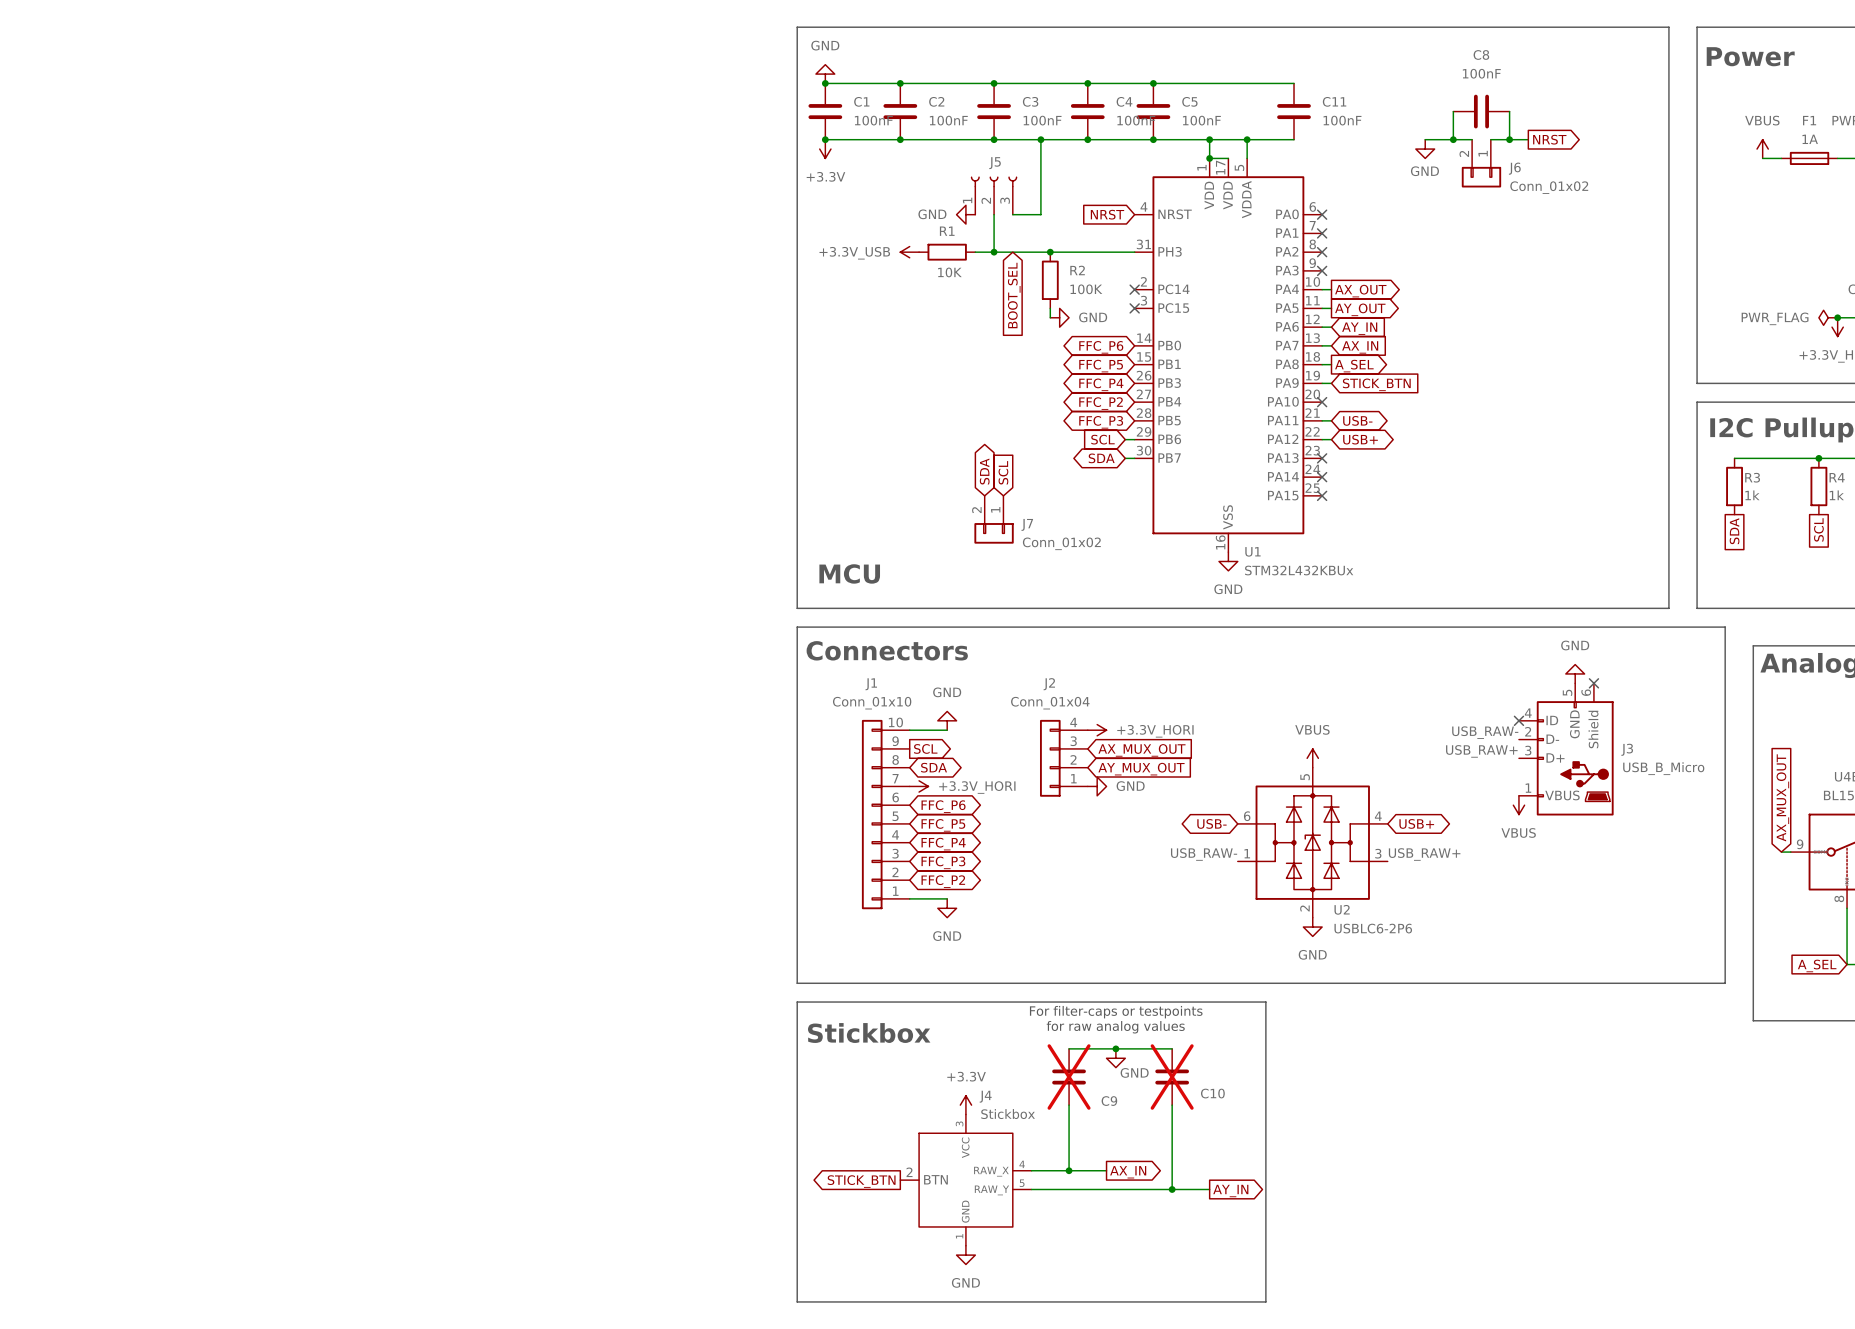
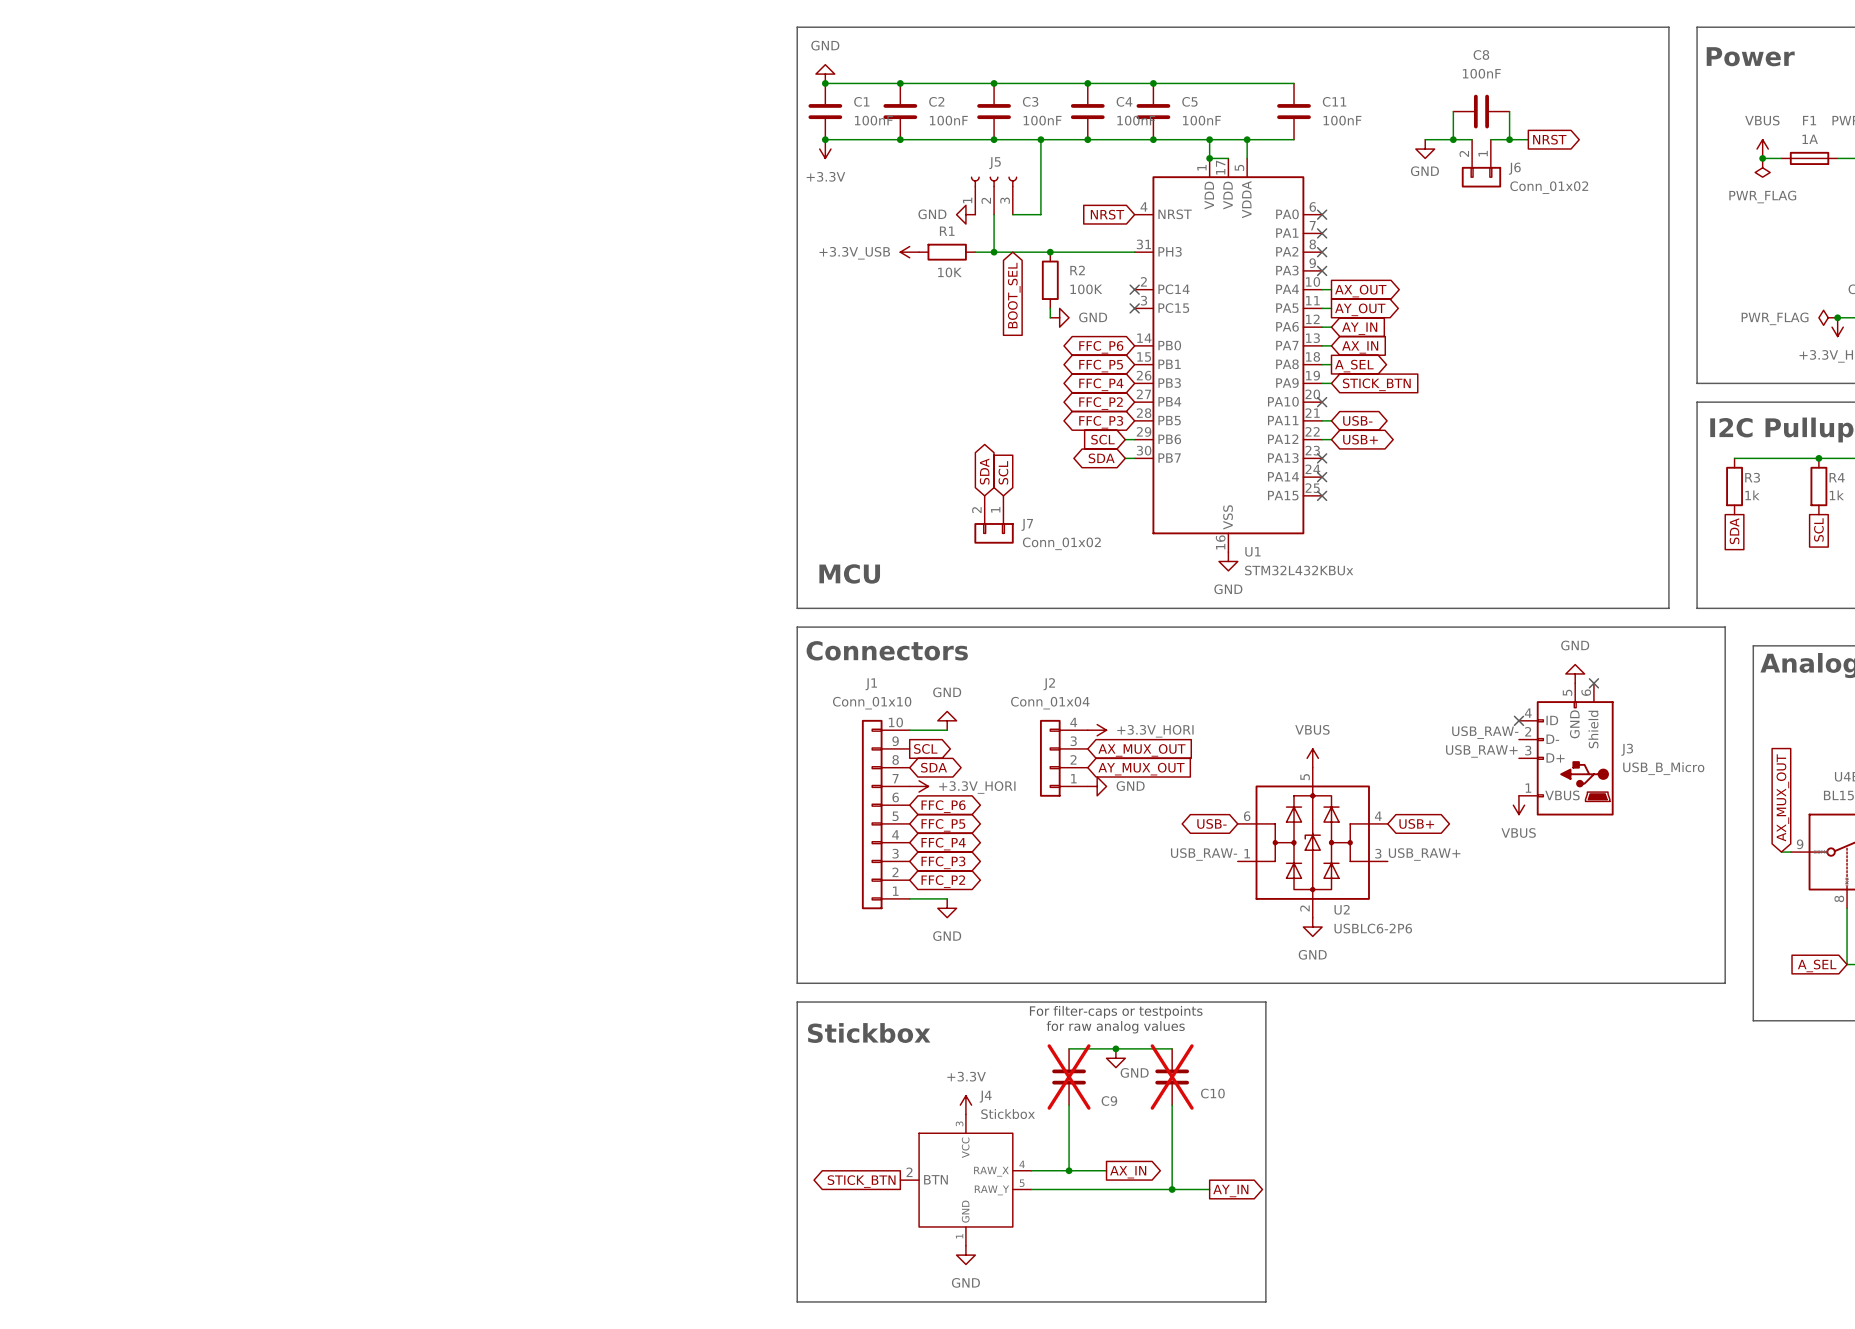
junction: none -> (1762, 158)
power symbol: none -> PWR_FLAG (1762, 167)

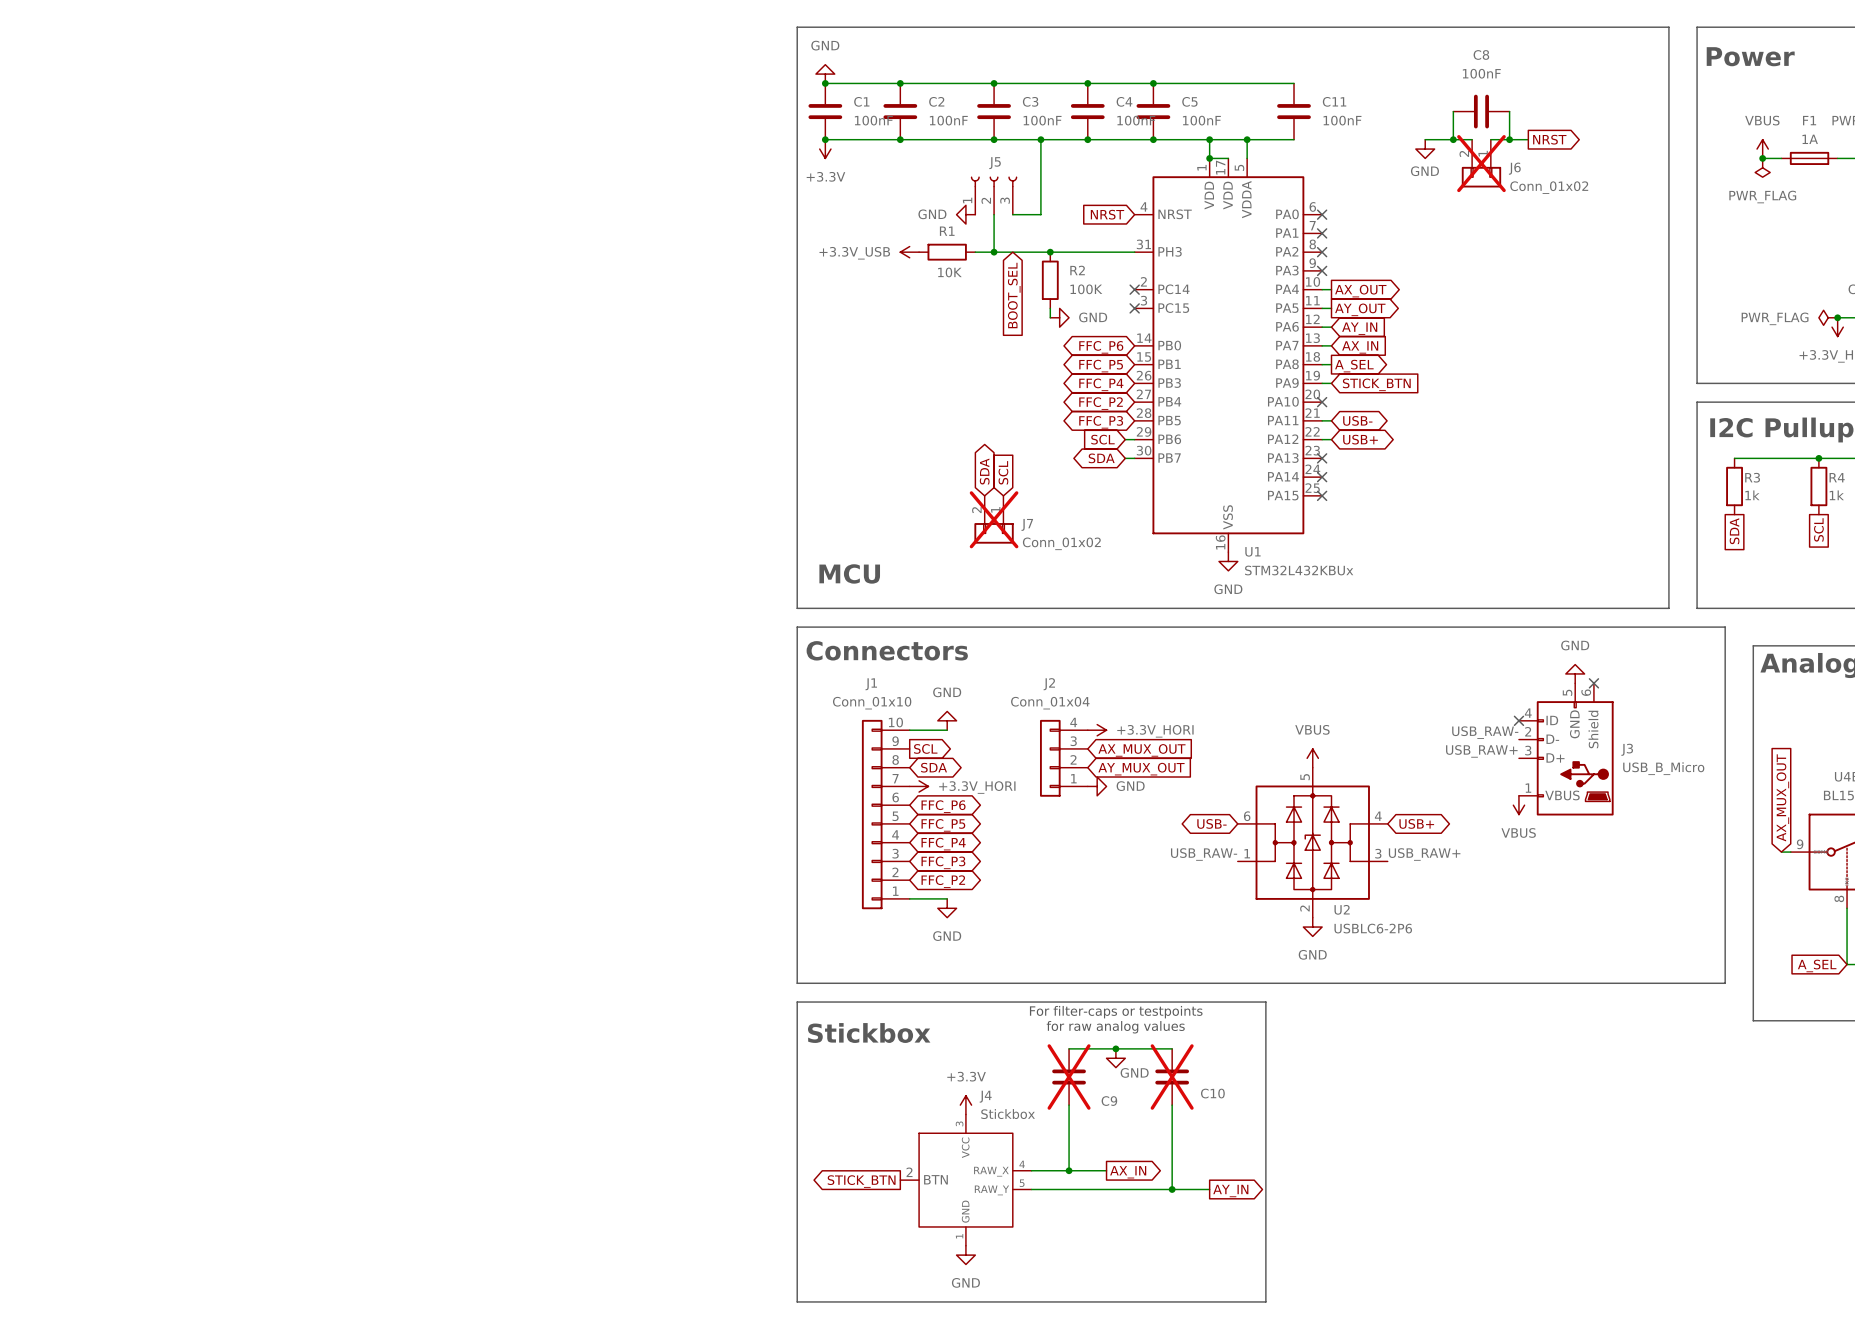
J6 do-not-place cross: none -> (1481, 163)
J7 do-not-place cross: none -> (994, 519)

